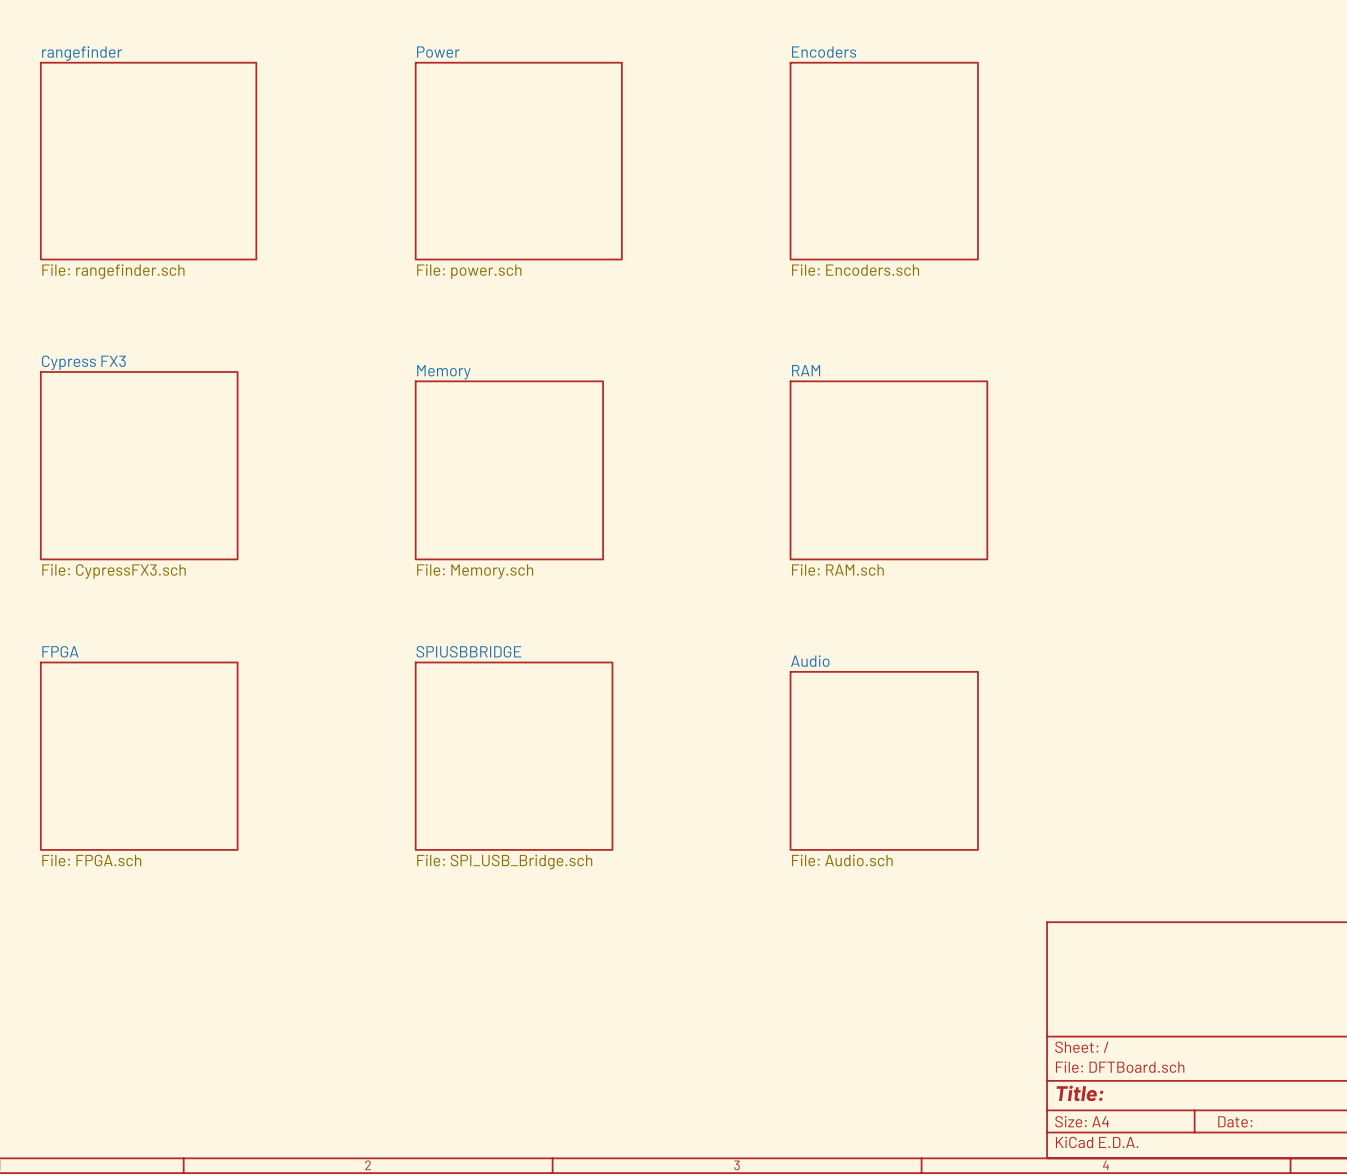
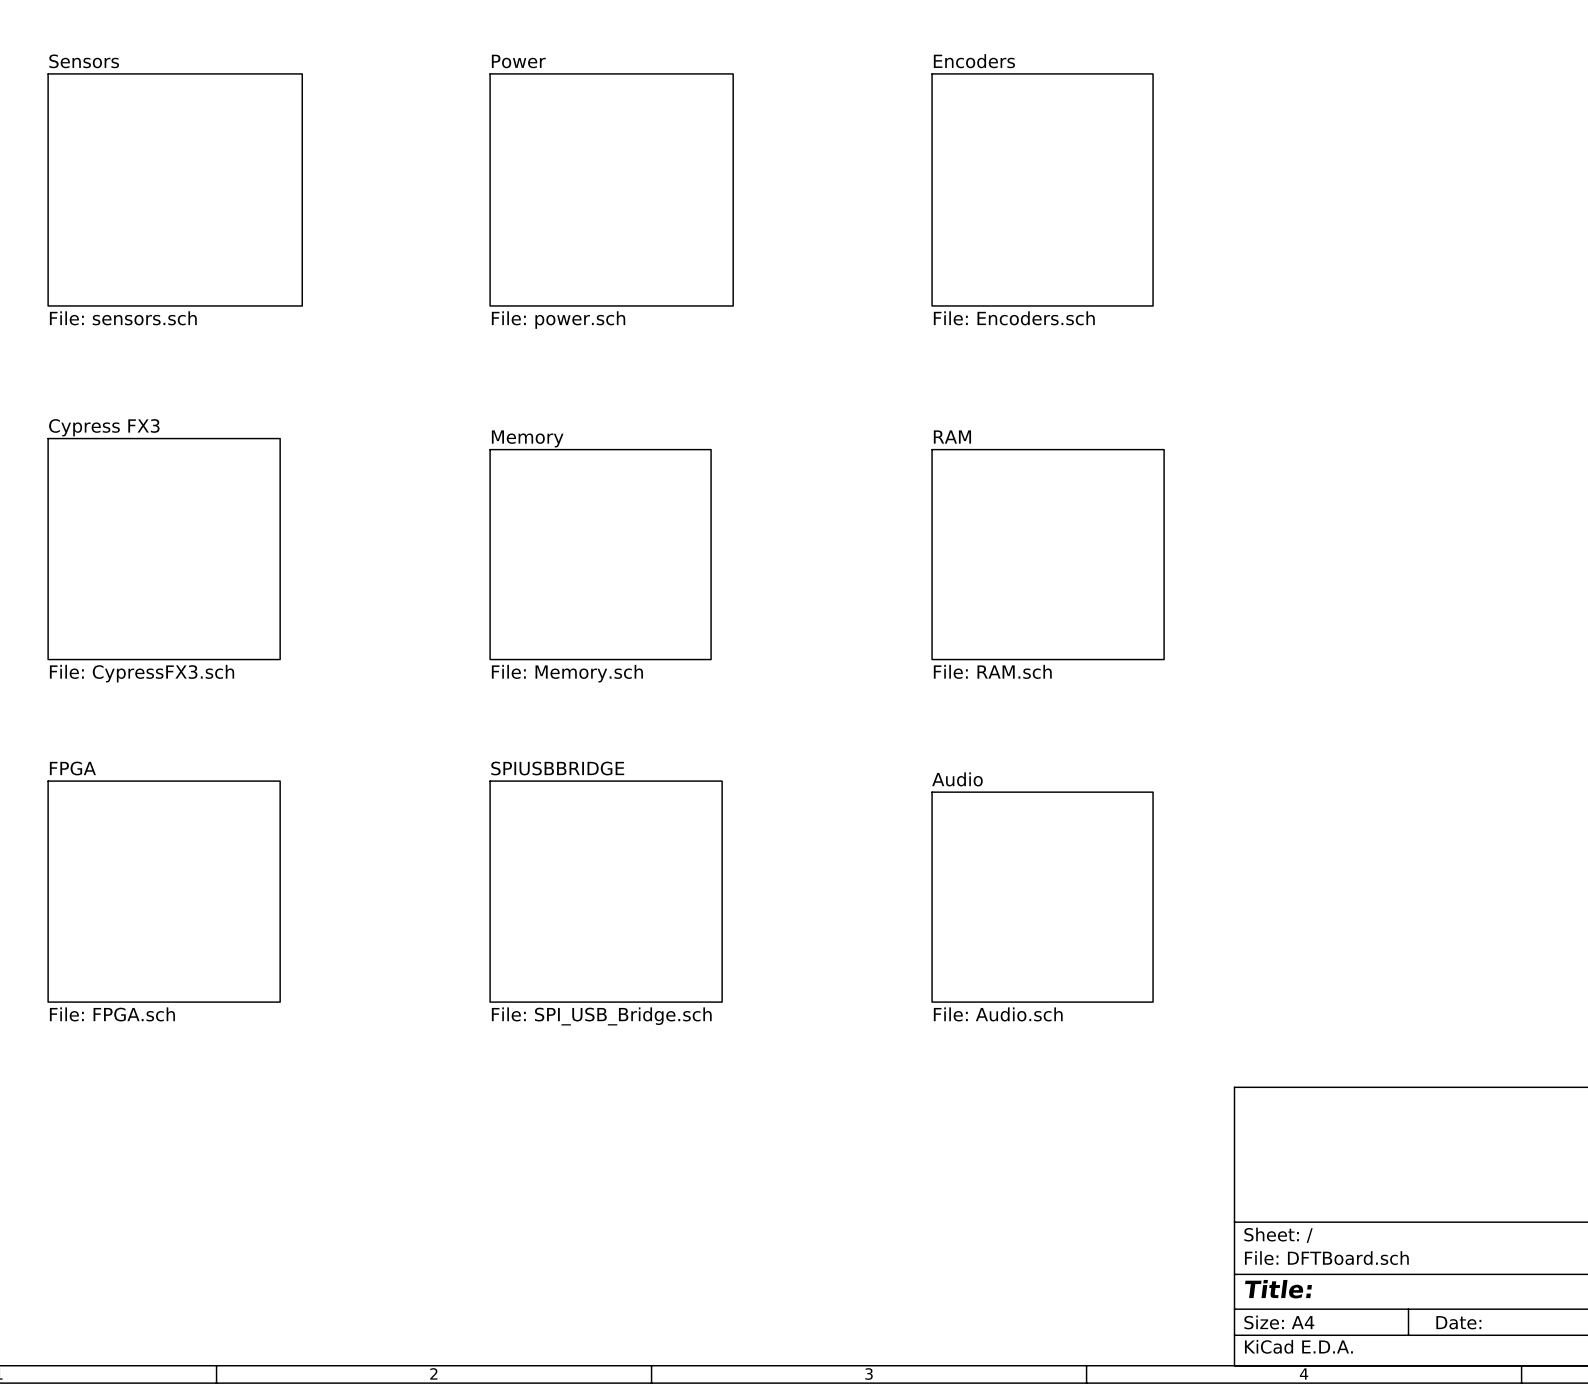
sheet rangefinder name: rangefinder (82, 53) -> Sensors (84, 61)
sheet rangefinder value: File: rangefinder.sch (113, 271) -> File: sensors.sch (123, 318)

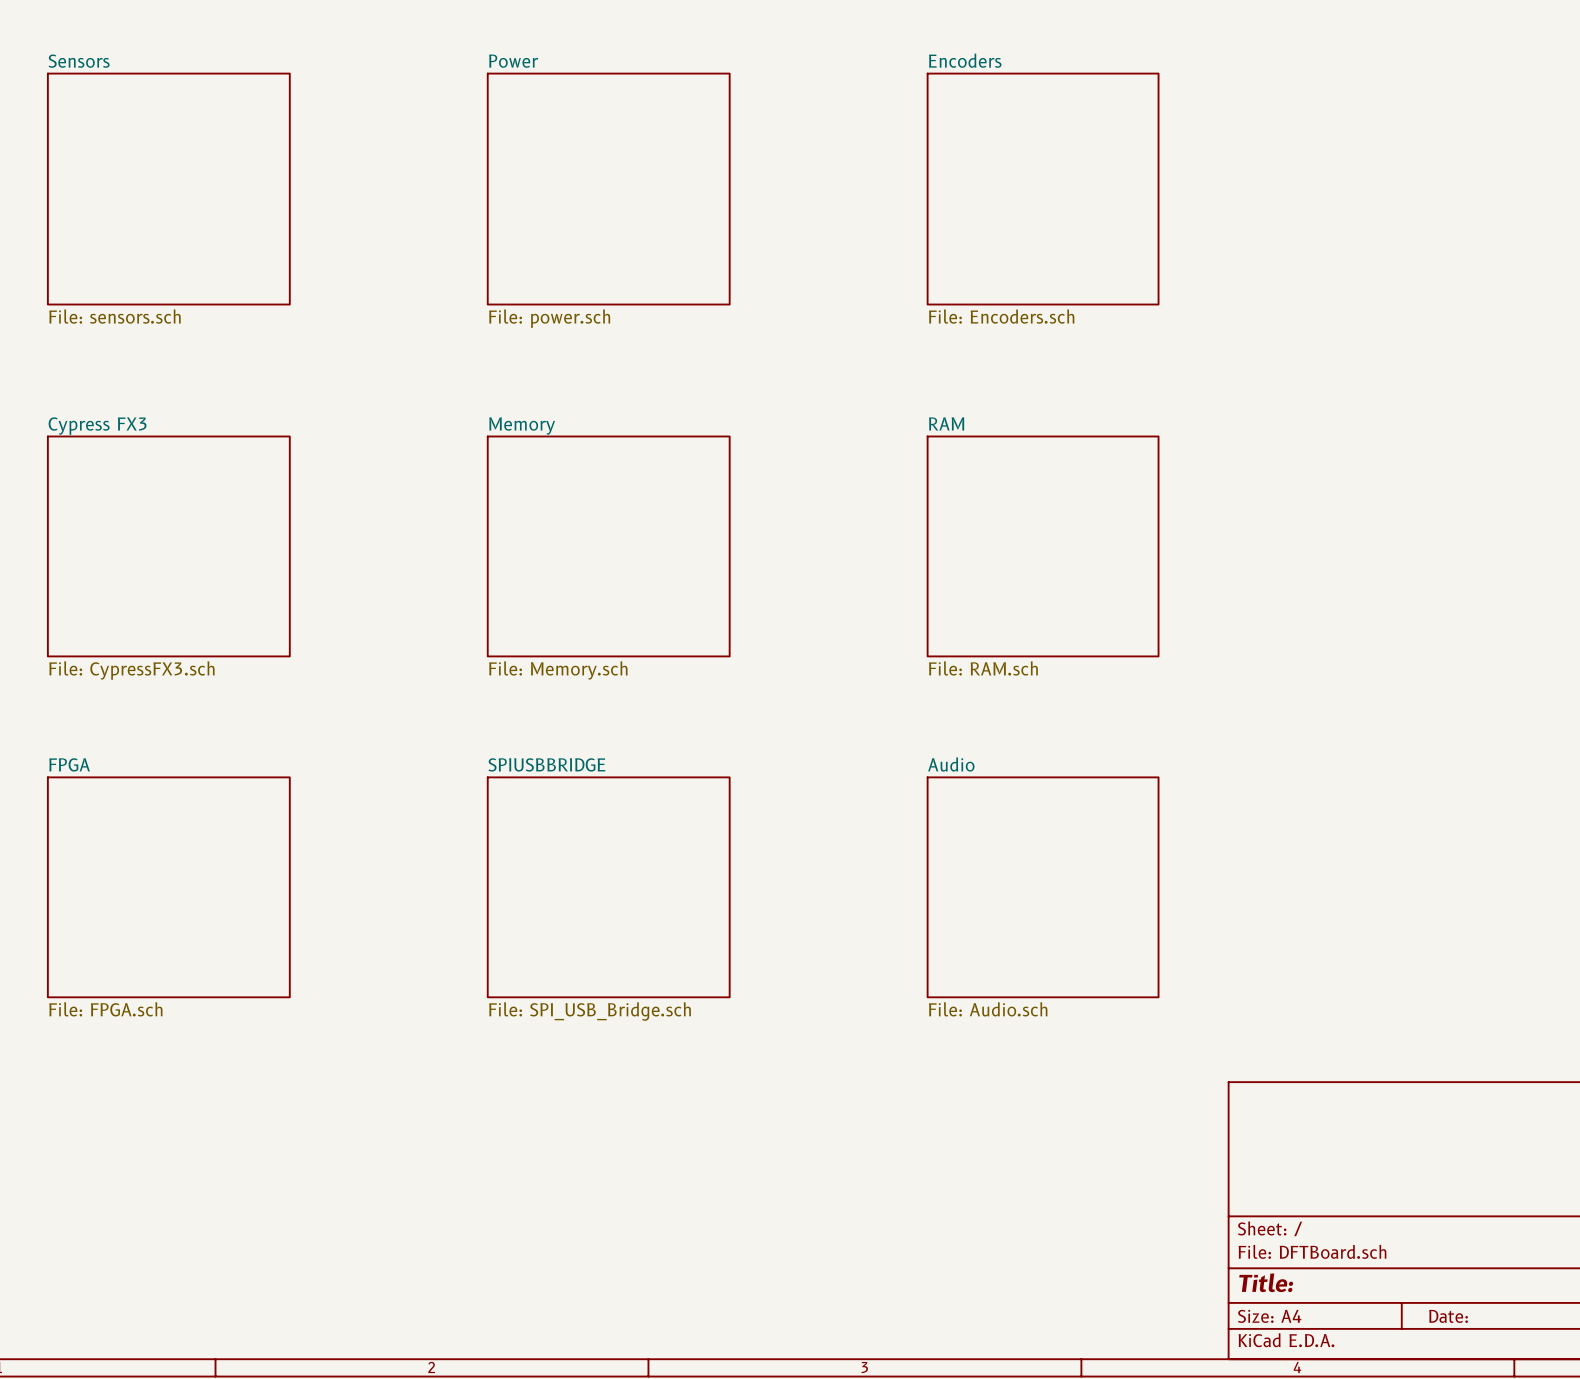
sheet Sensors shape: [48, 73, 303, 306] -> [47, 73, 290, 305]
sheet Encoders shape: [932, 73, 1154, 306] -> [927, 73, 1159, 305]
sheet Cypress FX3 shape: [48, 438, 281, 660] -> [47, 436, 290, 657]
sheet RAM shape: [932, 449, 1165, 660] -> [927, 436, 1159, 657]
sheet Memory: none -> File: Memory.sch (608, 546)
sheet Memory: File: Memory.sch (600, 554) -> none
sheet FPGA shape: [48, 781, 281, 1003] -> [47, 777, 290, 998]
sheet SPIUSBBRIDGE shape: [490, 781, 723, 1003] -> [487, 777, 730, 998]
sheet Audio shape: [932, 792, 1154, 1003] -> [927, 777, 1159, 998]

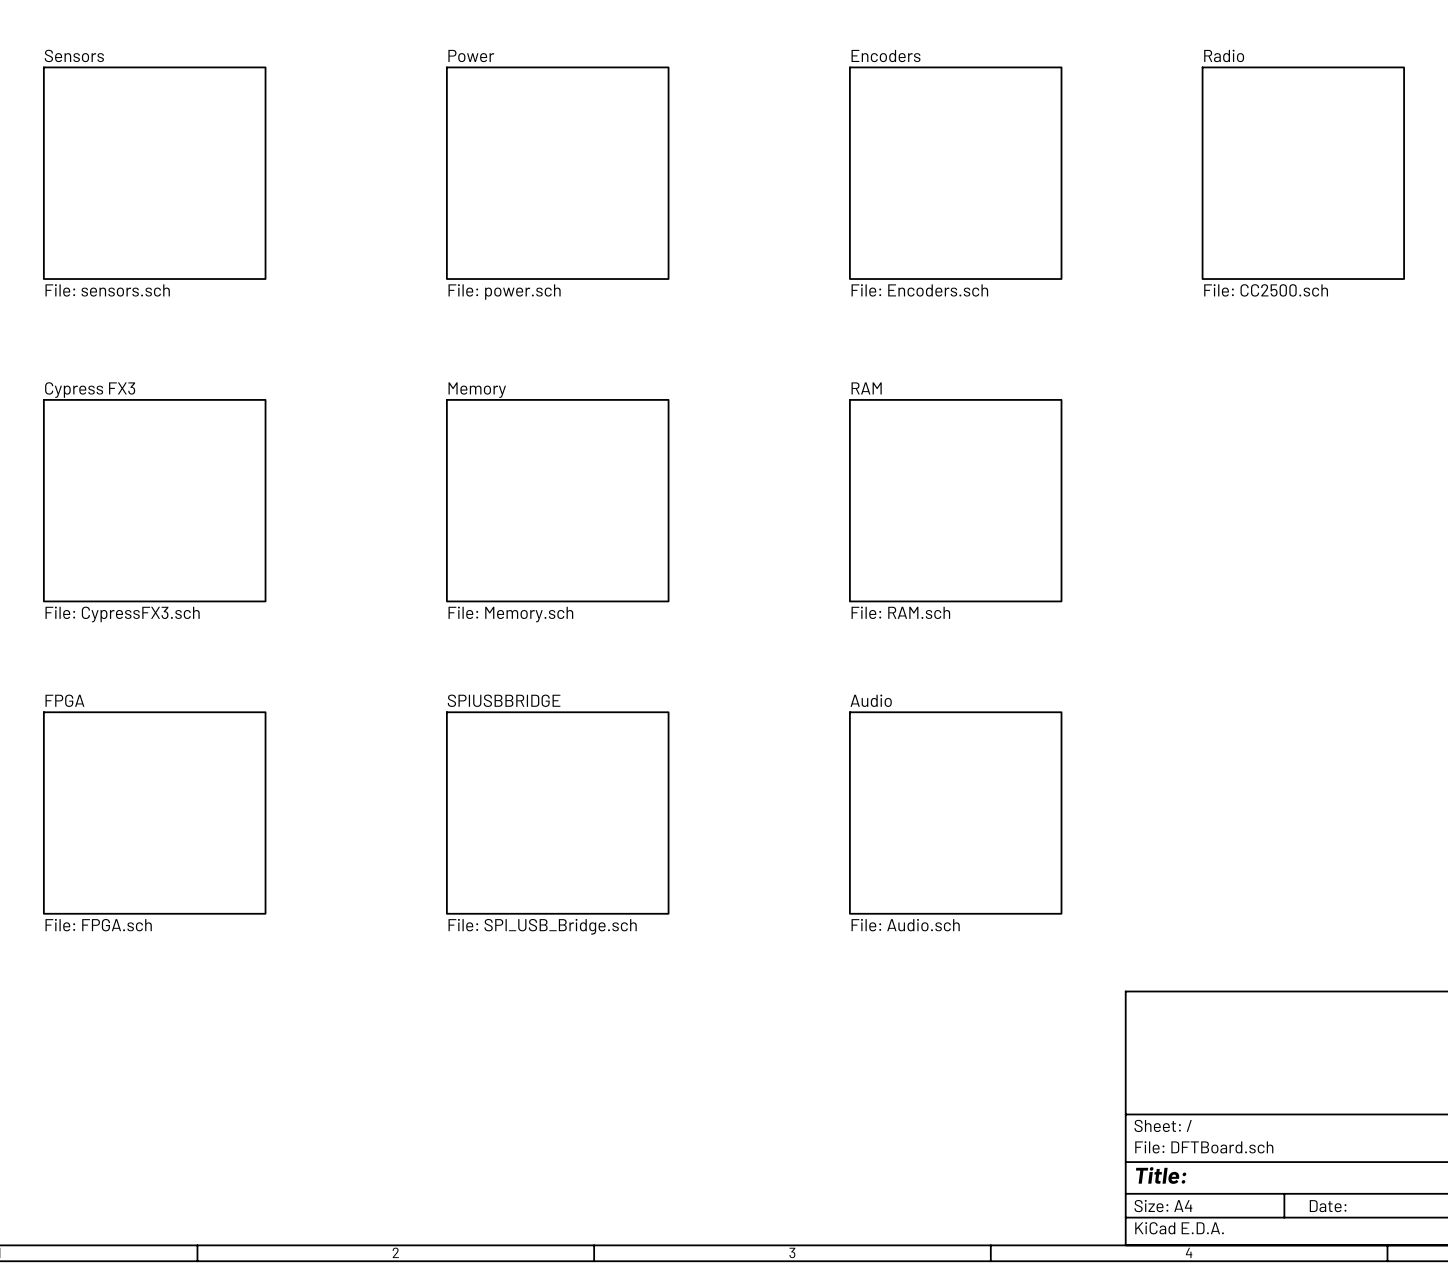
sheet Radio: none -> File: CC2500.sch (1303, 173)

